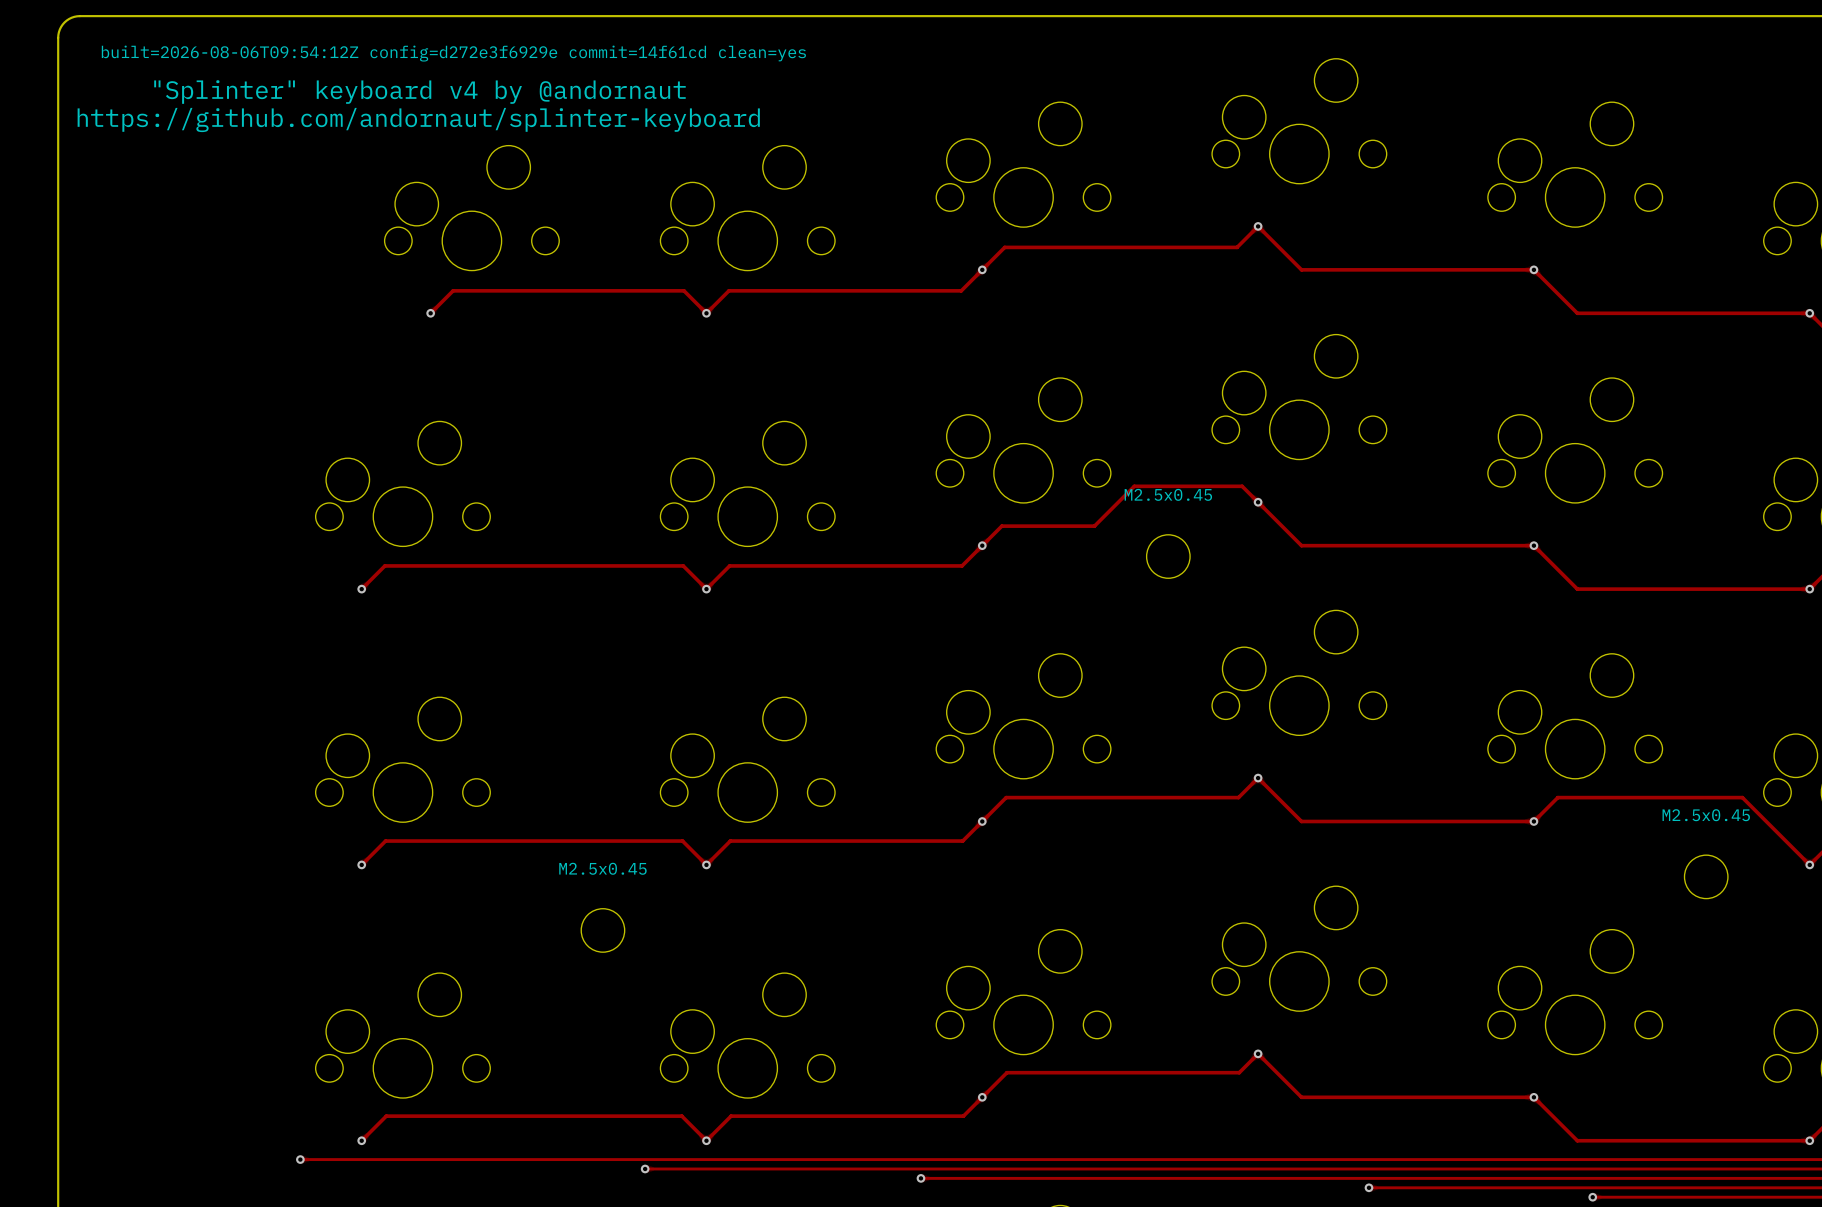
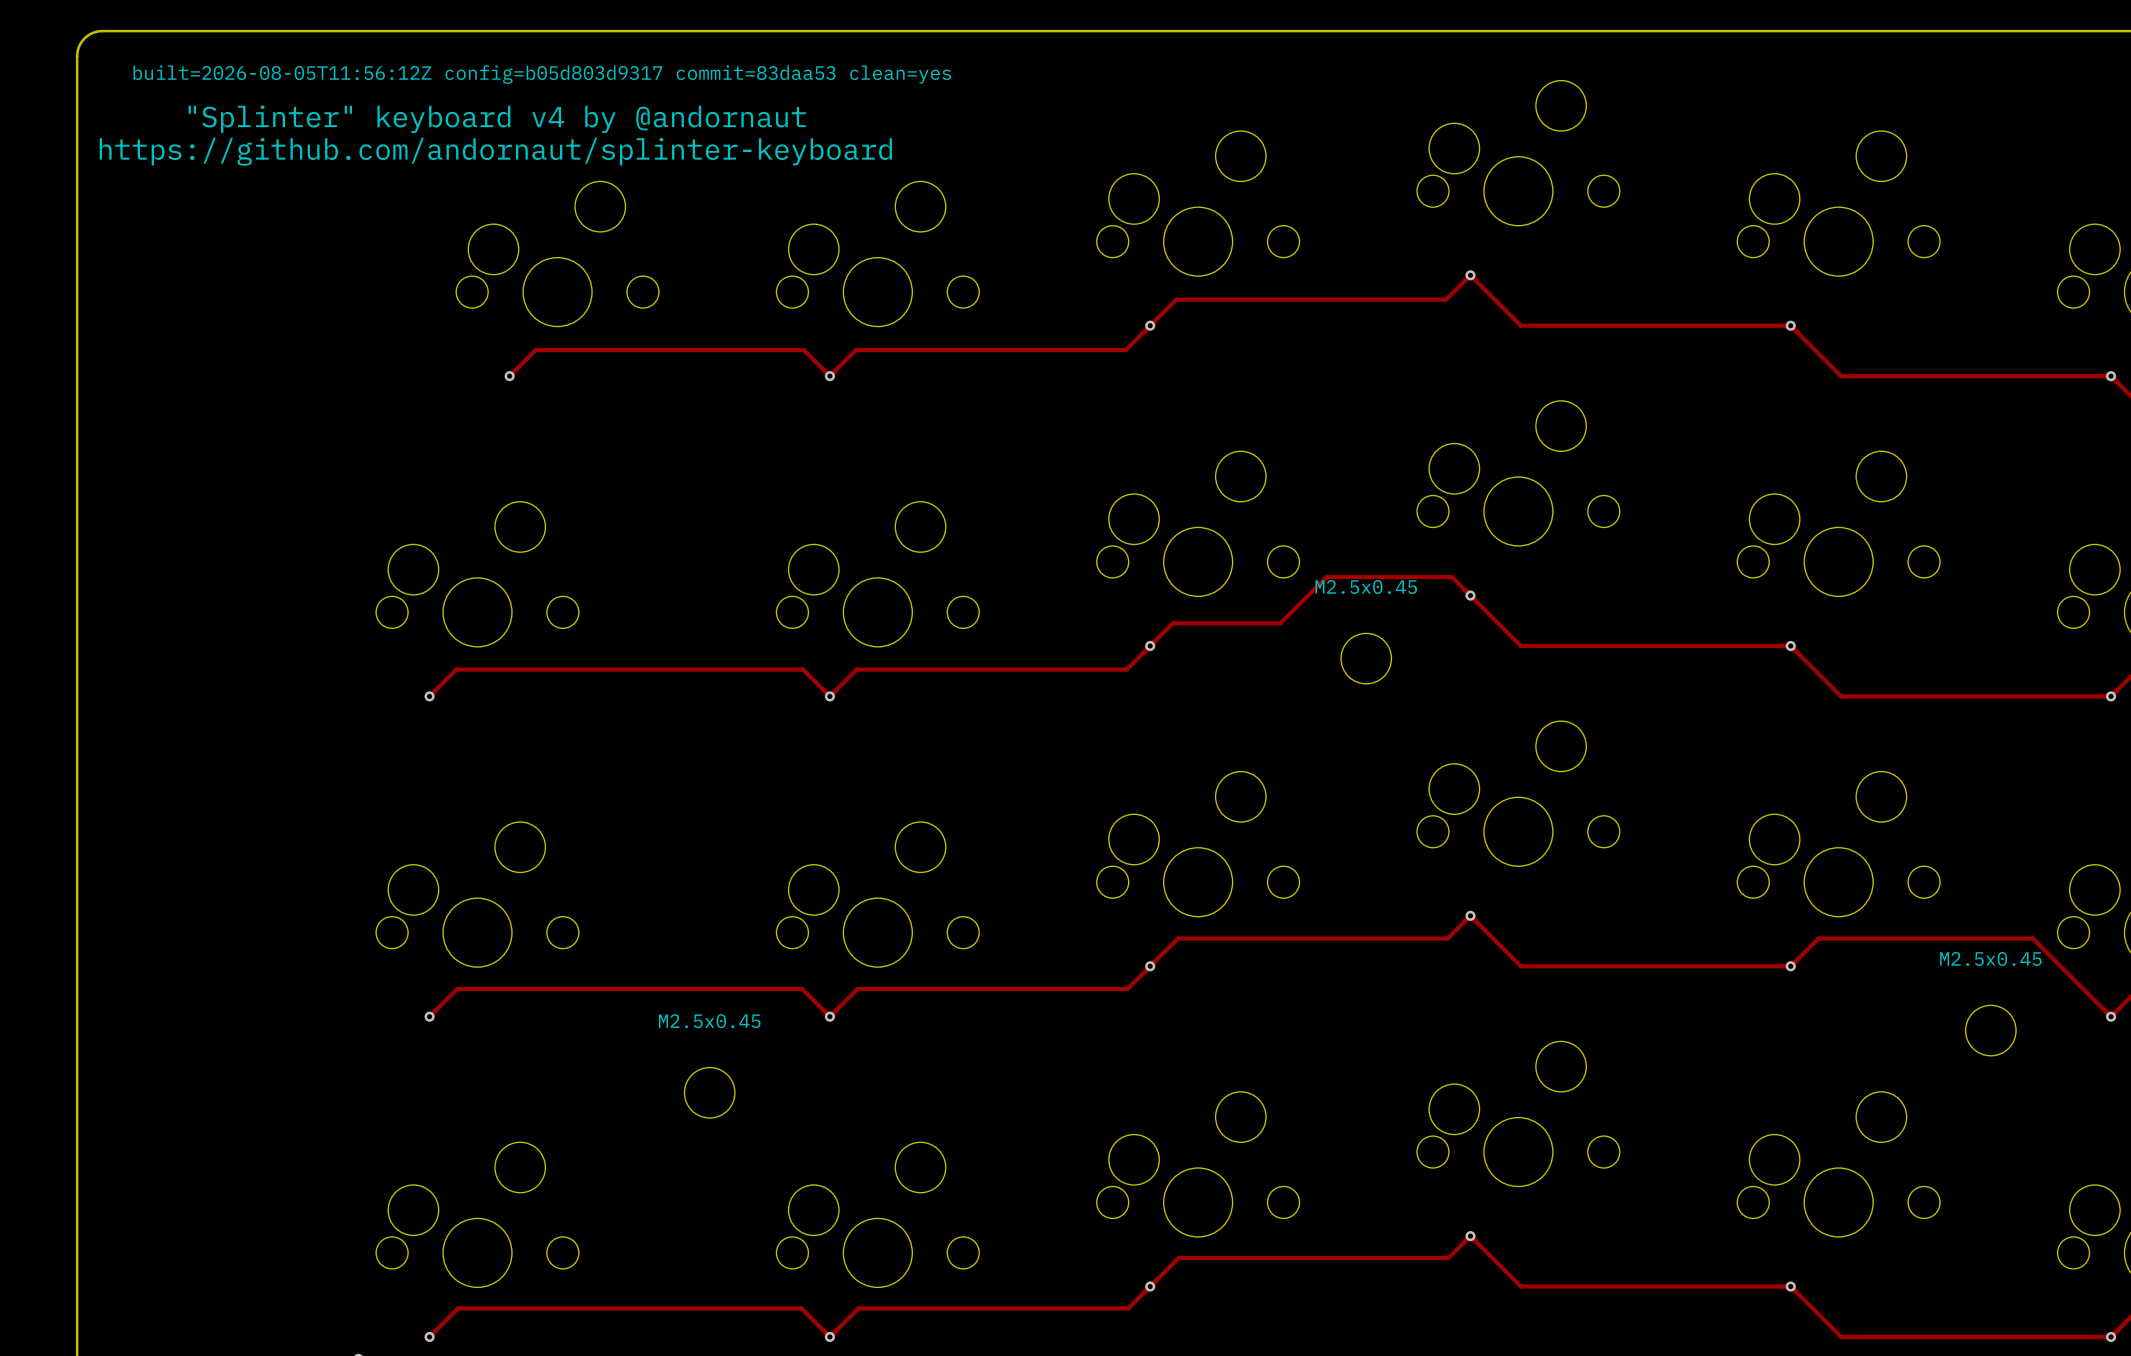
text: built=2026-08-06T09:54:12Z config=d272e3f6929e commit=14f61cd clean=yes (453, 53) -> built=2026-08-05T11:56:12Z config=b05d803d9317 commit=83daa53 clean=yes (542, 74)

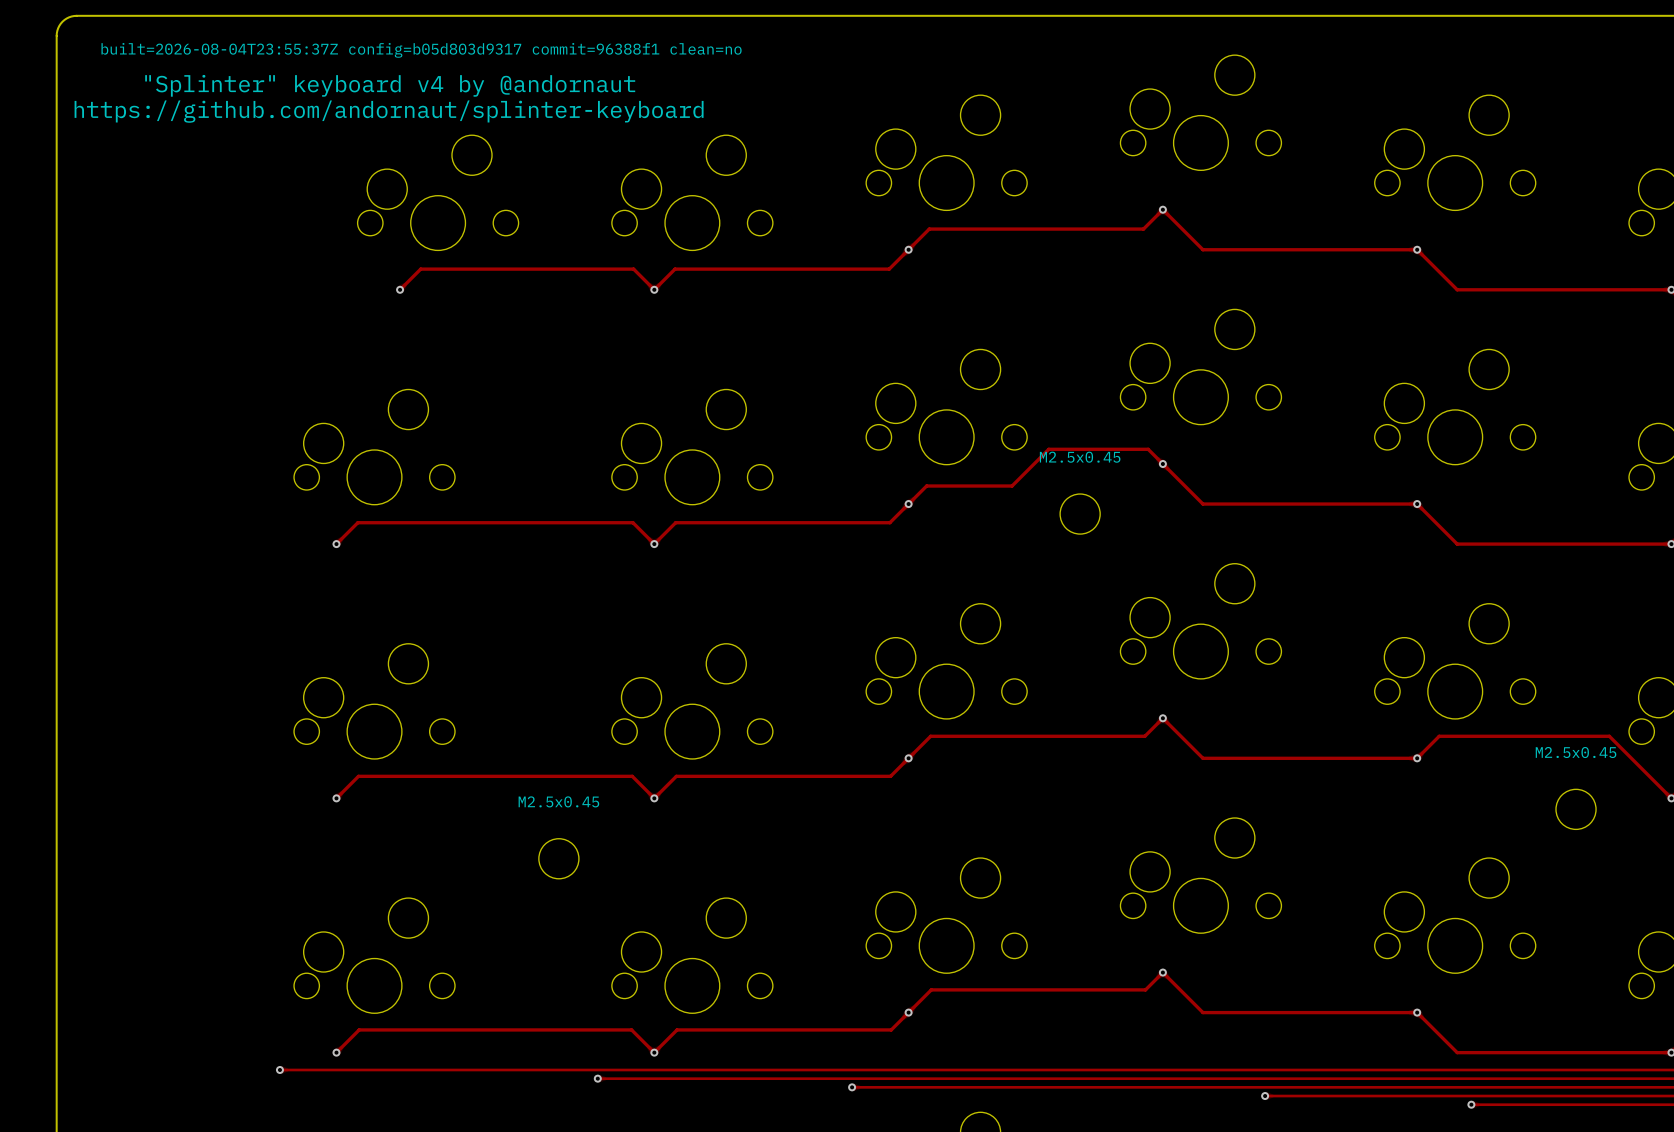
text: built=2026-08-05T11:56:12Z config=b05d803d9317 commit=83daa53 clean=yes (542, 74) -> built=2026-08-04T23:55:37Z config=b05d803d9317 commit=96388f1 clean=no (421, 50)

